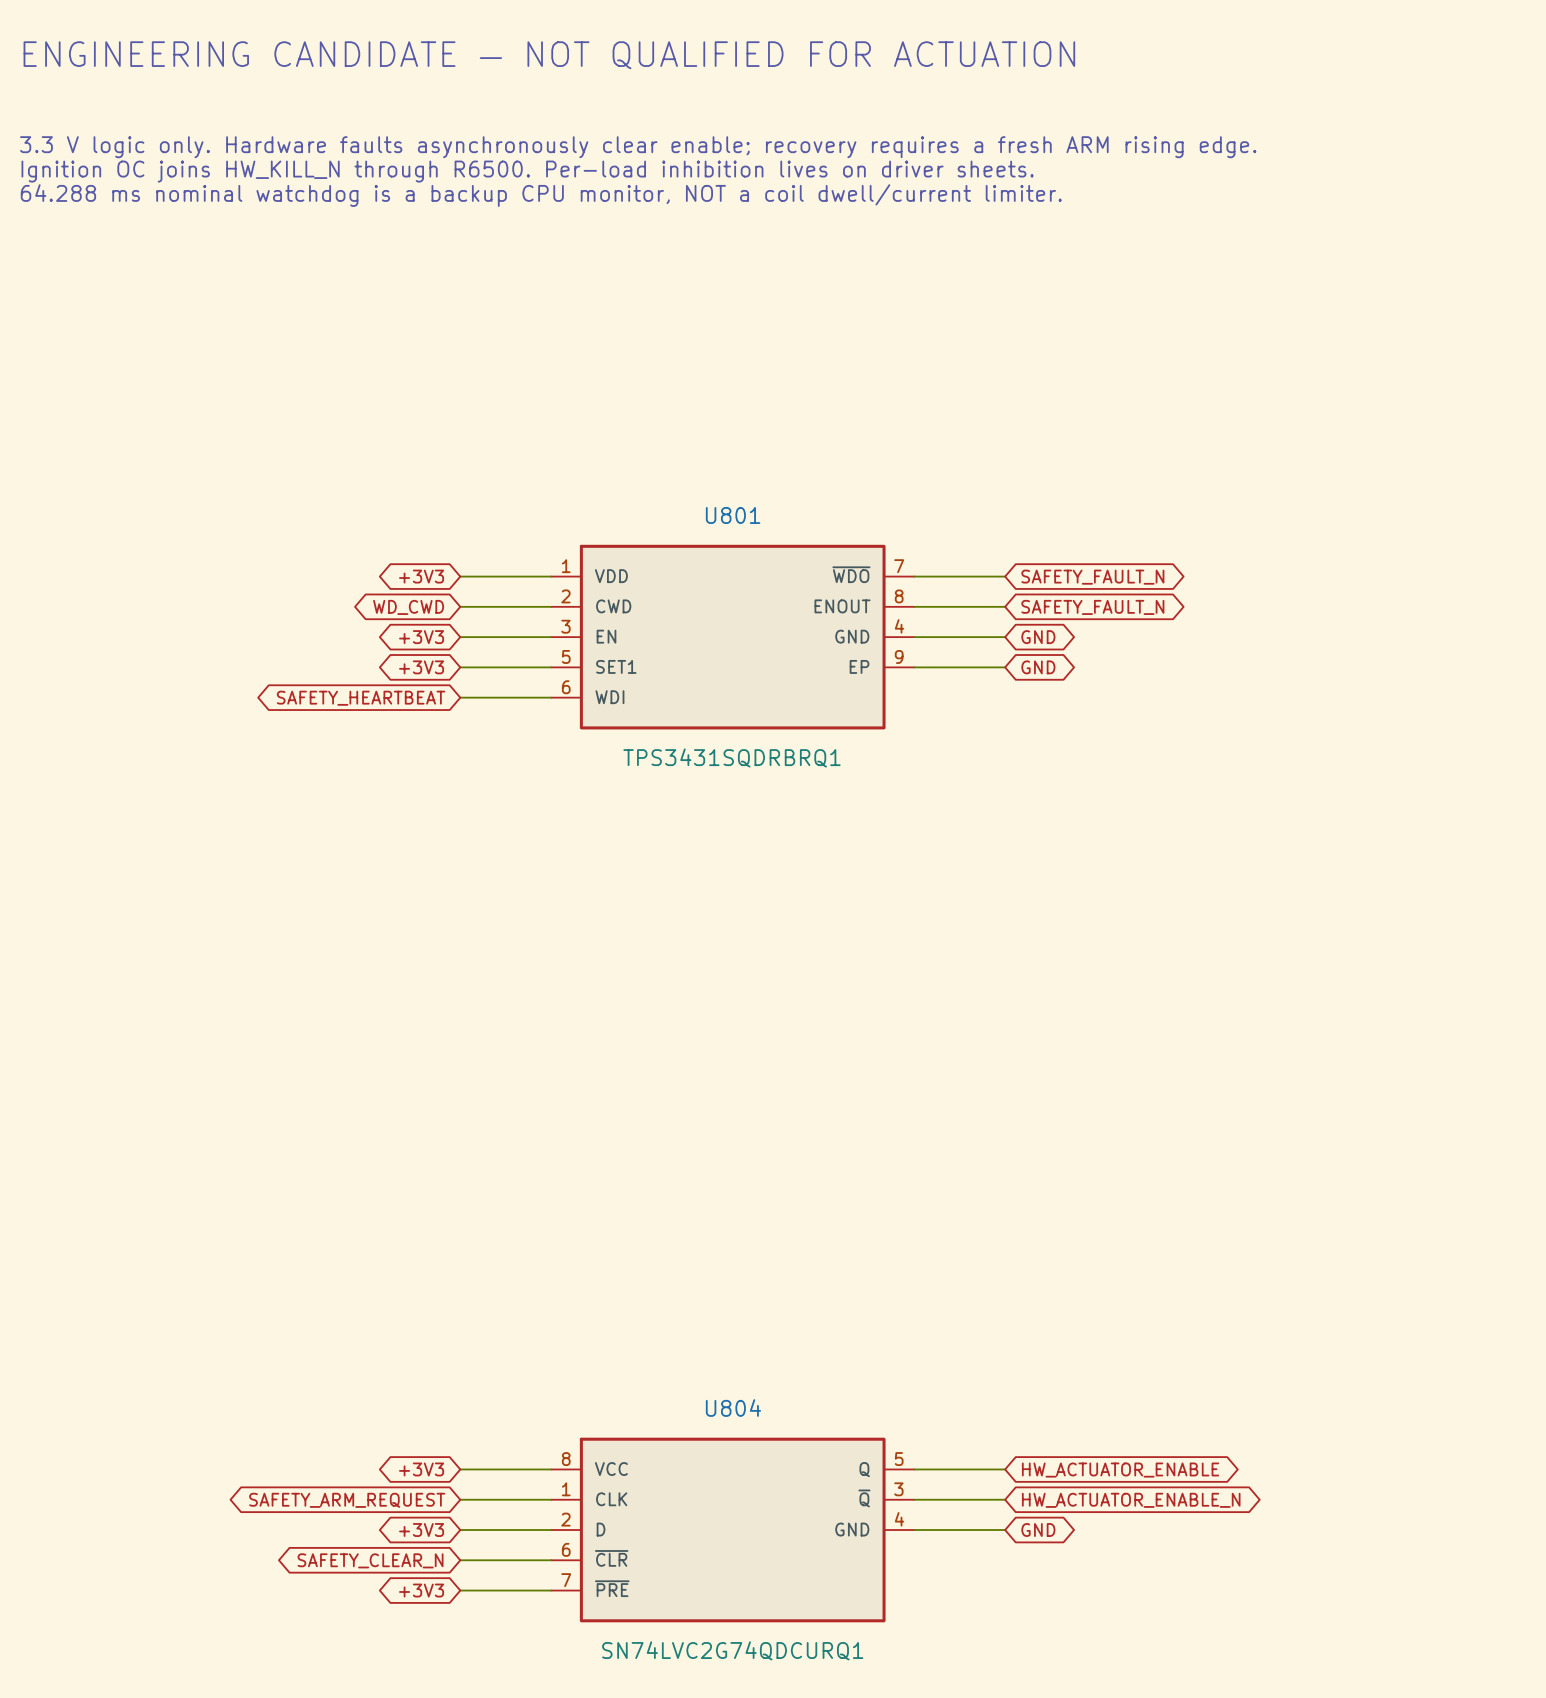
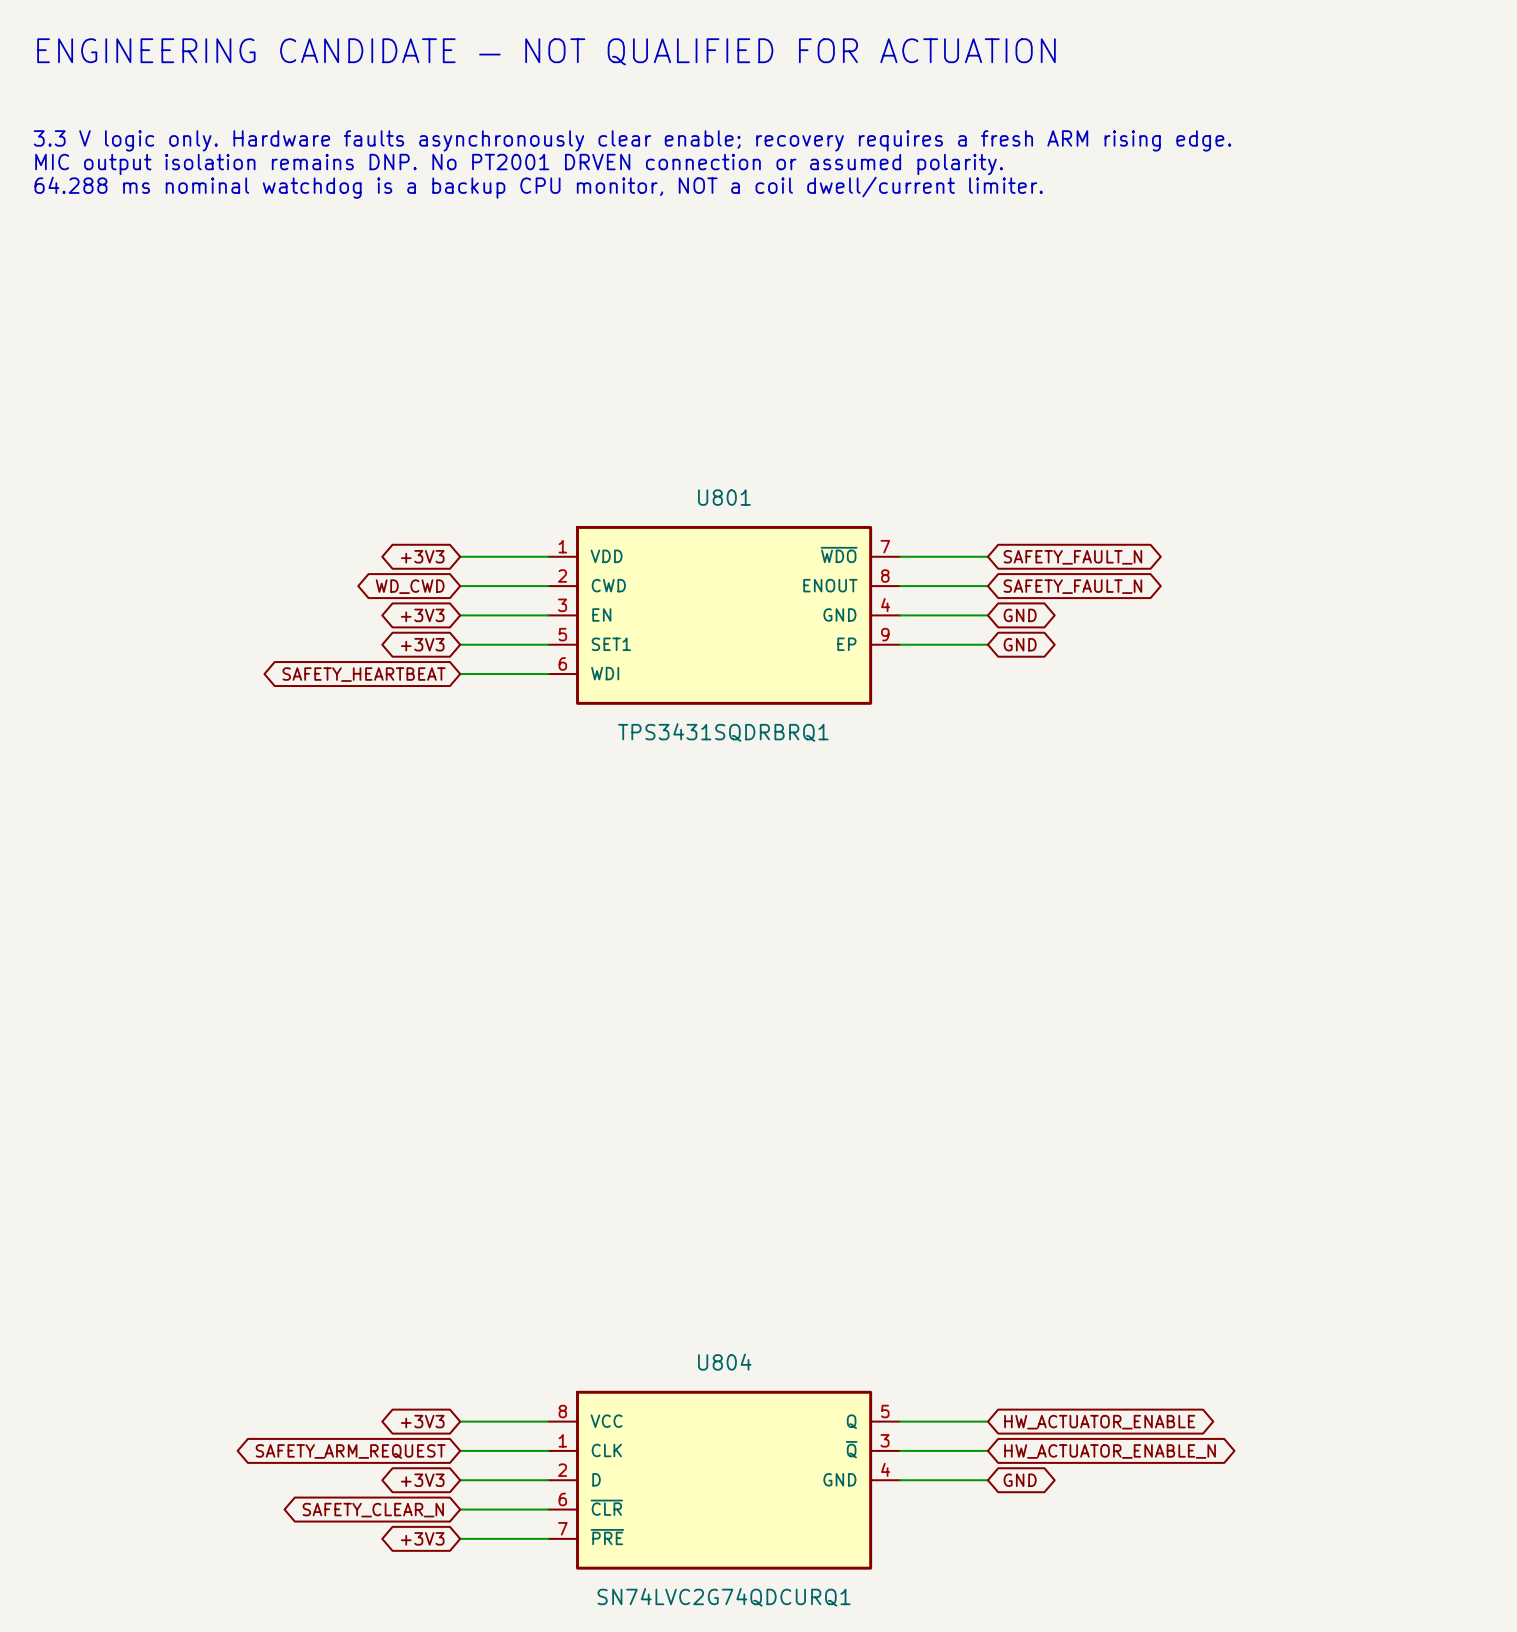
text: Ignition OC joins HW_KILL_N through R6500. Per-load inhibition lives on driver sheets. (527, 171) -> MIC output isolation remains DNP. No PT2001 DRVEN connection or assumed polarity. (519, 164)

